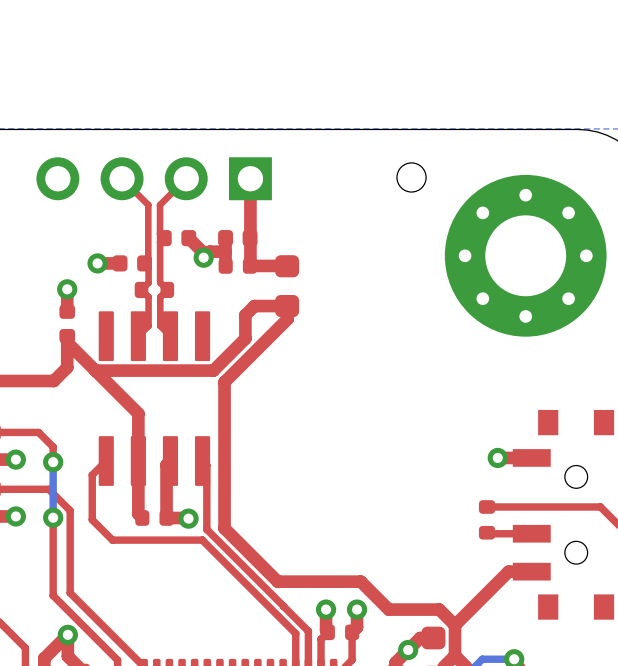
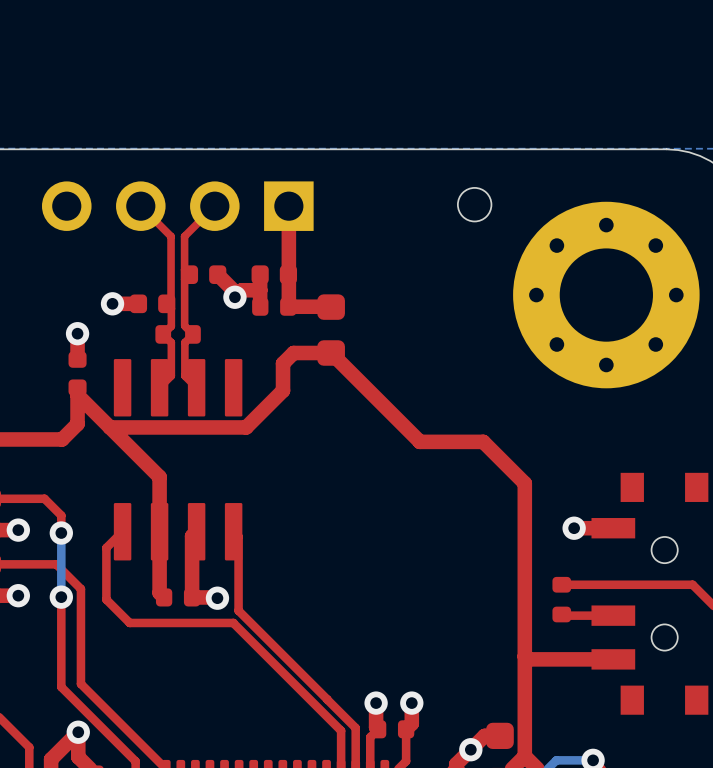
top track: (287, 306) (287, 318) (224, 382) (224, 528) (277, 581) (360, 581) (388, 609) (439, 609) (455, 625) (508, 571) -> (331, 353) (419, 441)
top track: none -> (419, 441) (483, 441) (524, 483) (524, 721)
top track: none -> (524, 656) (527, 659) (586, 659)

